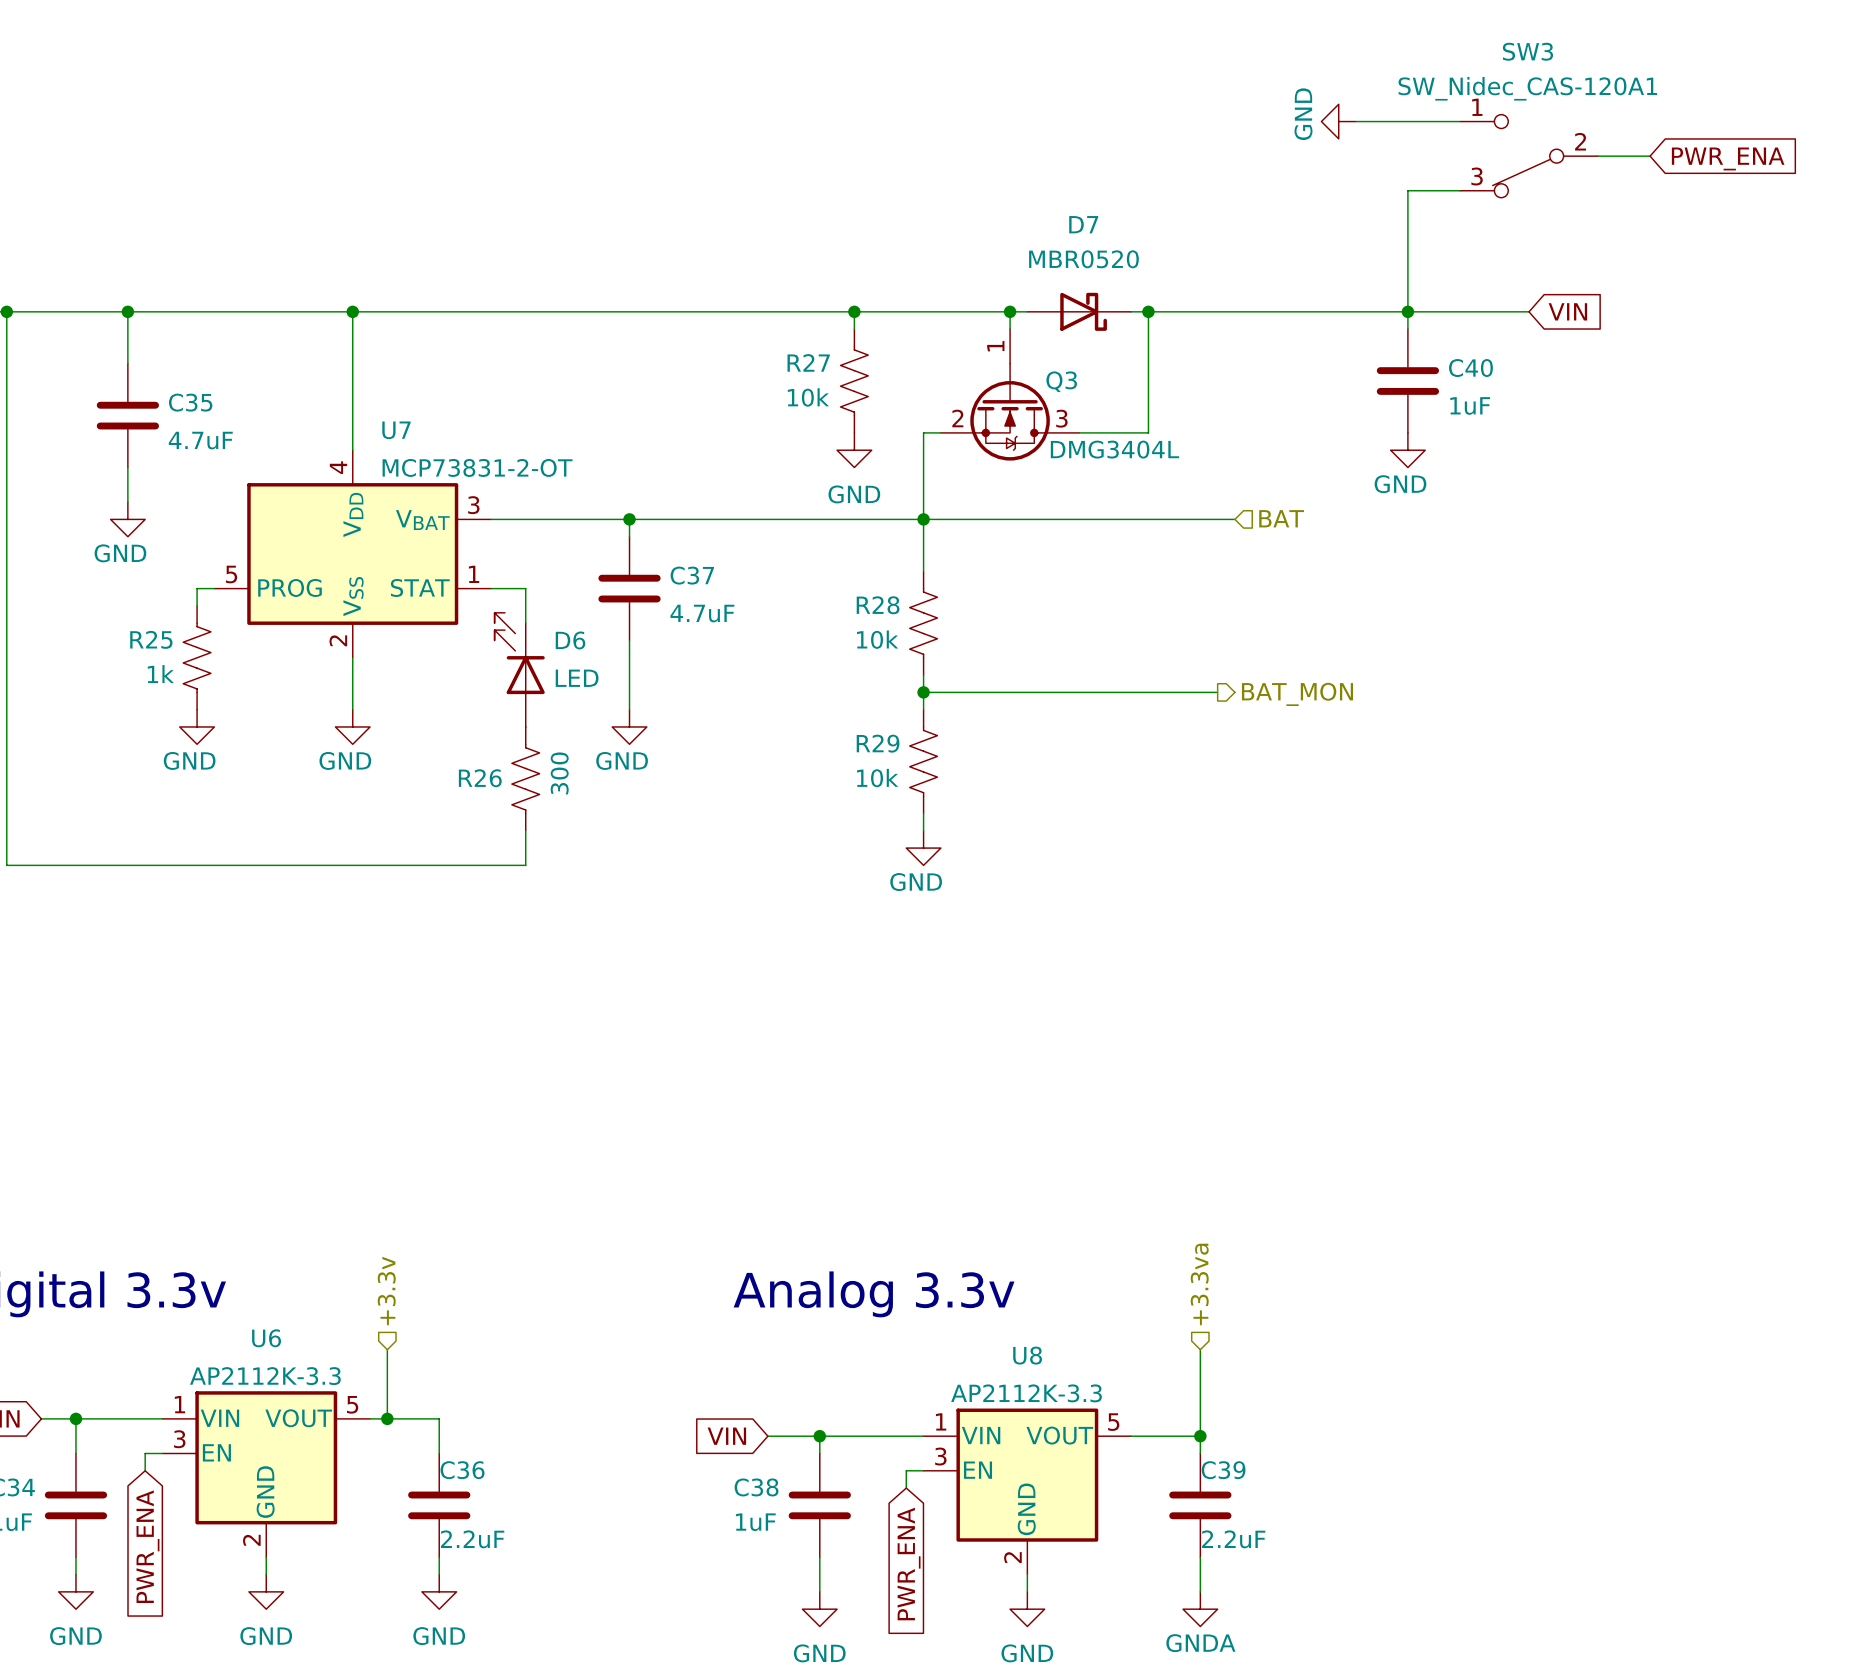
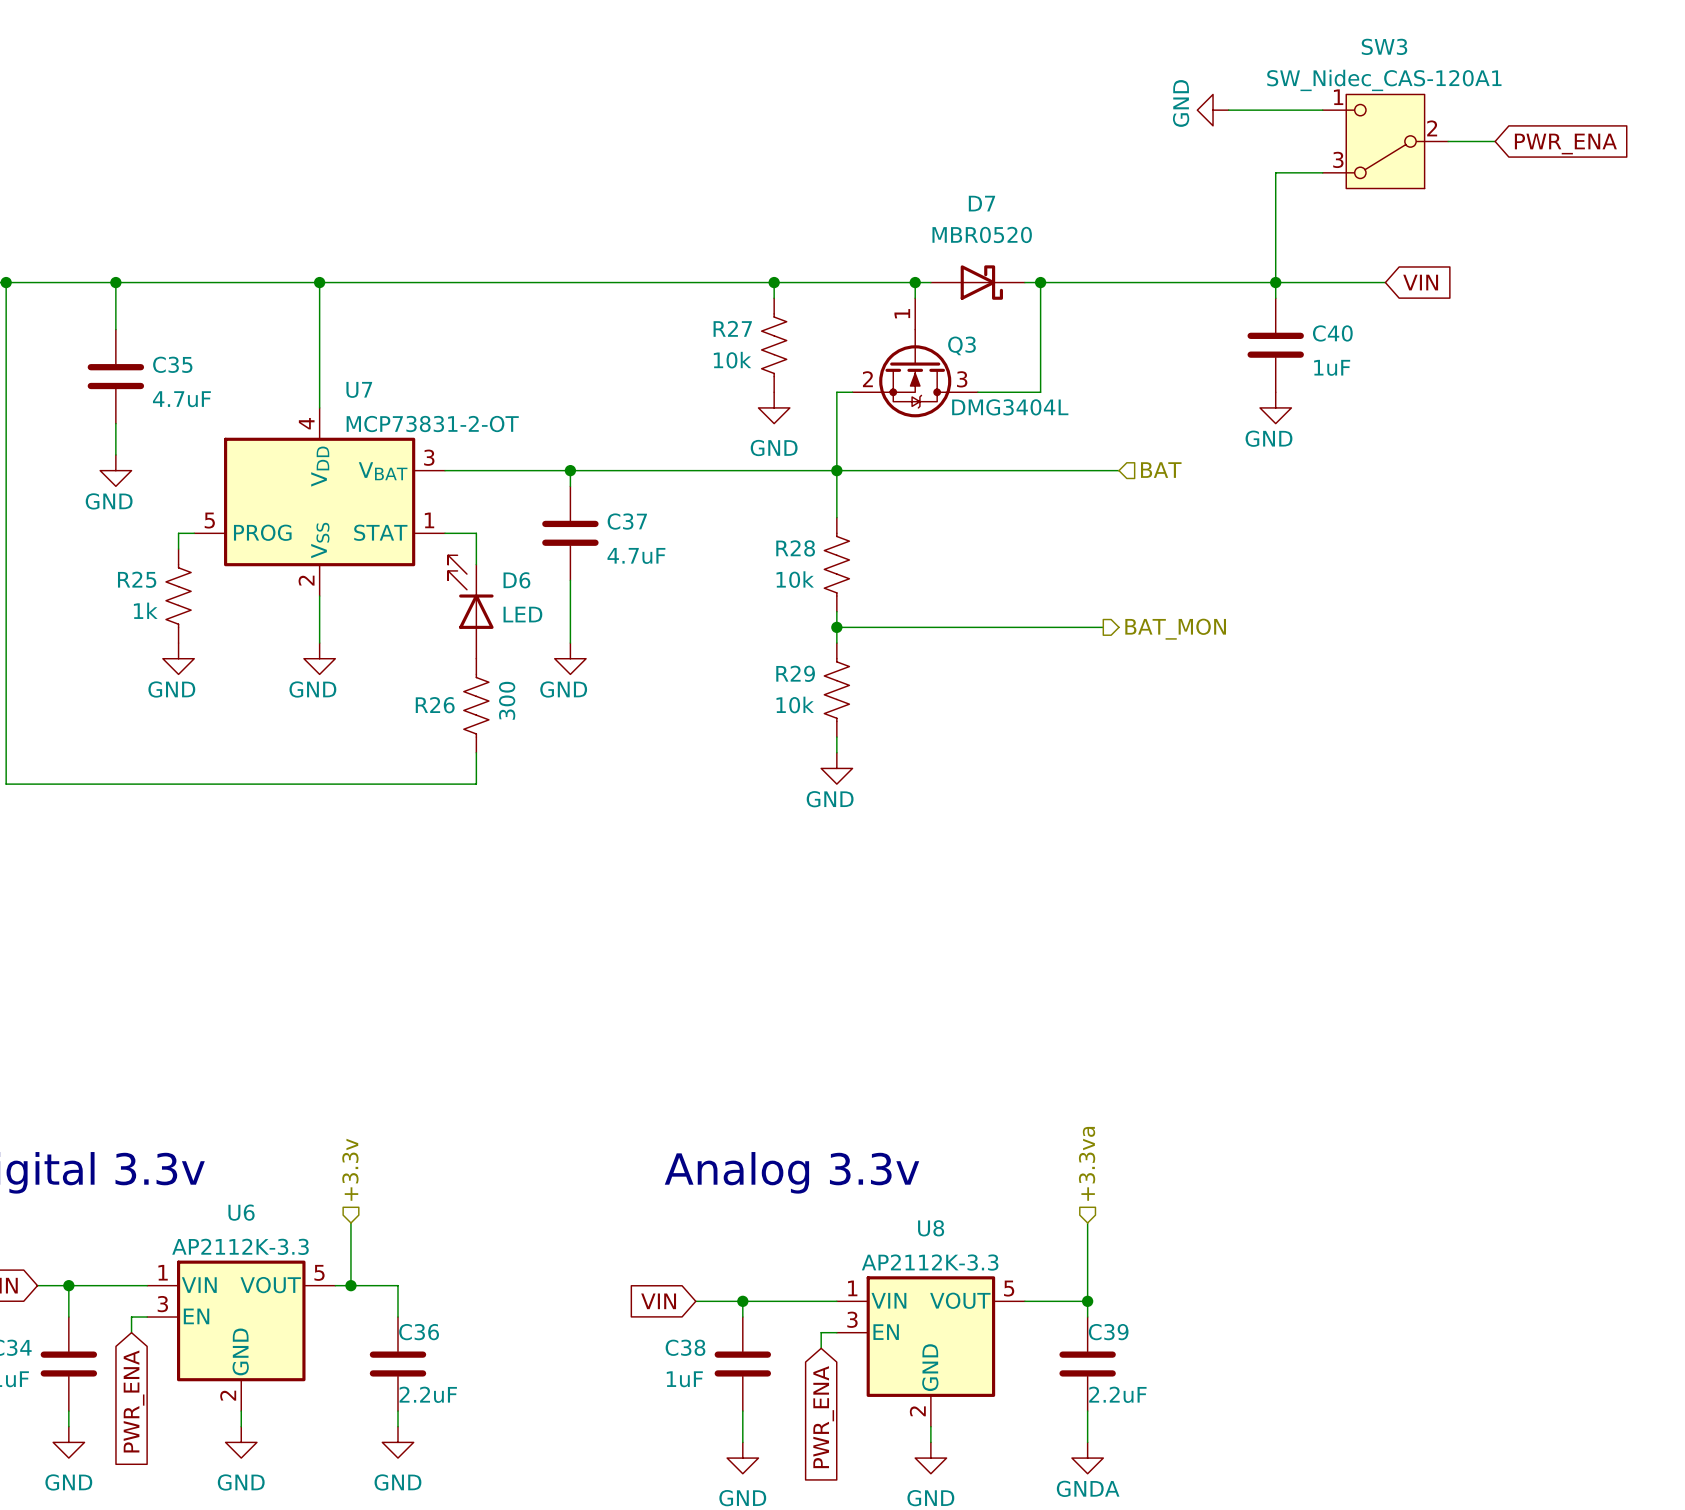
SW3 symbol: [1459, 114, 1599, 198] -> [1322, 94, 1449, 189]

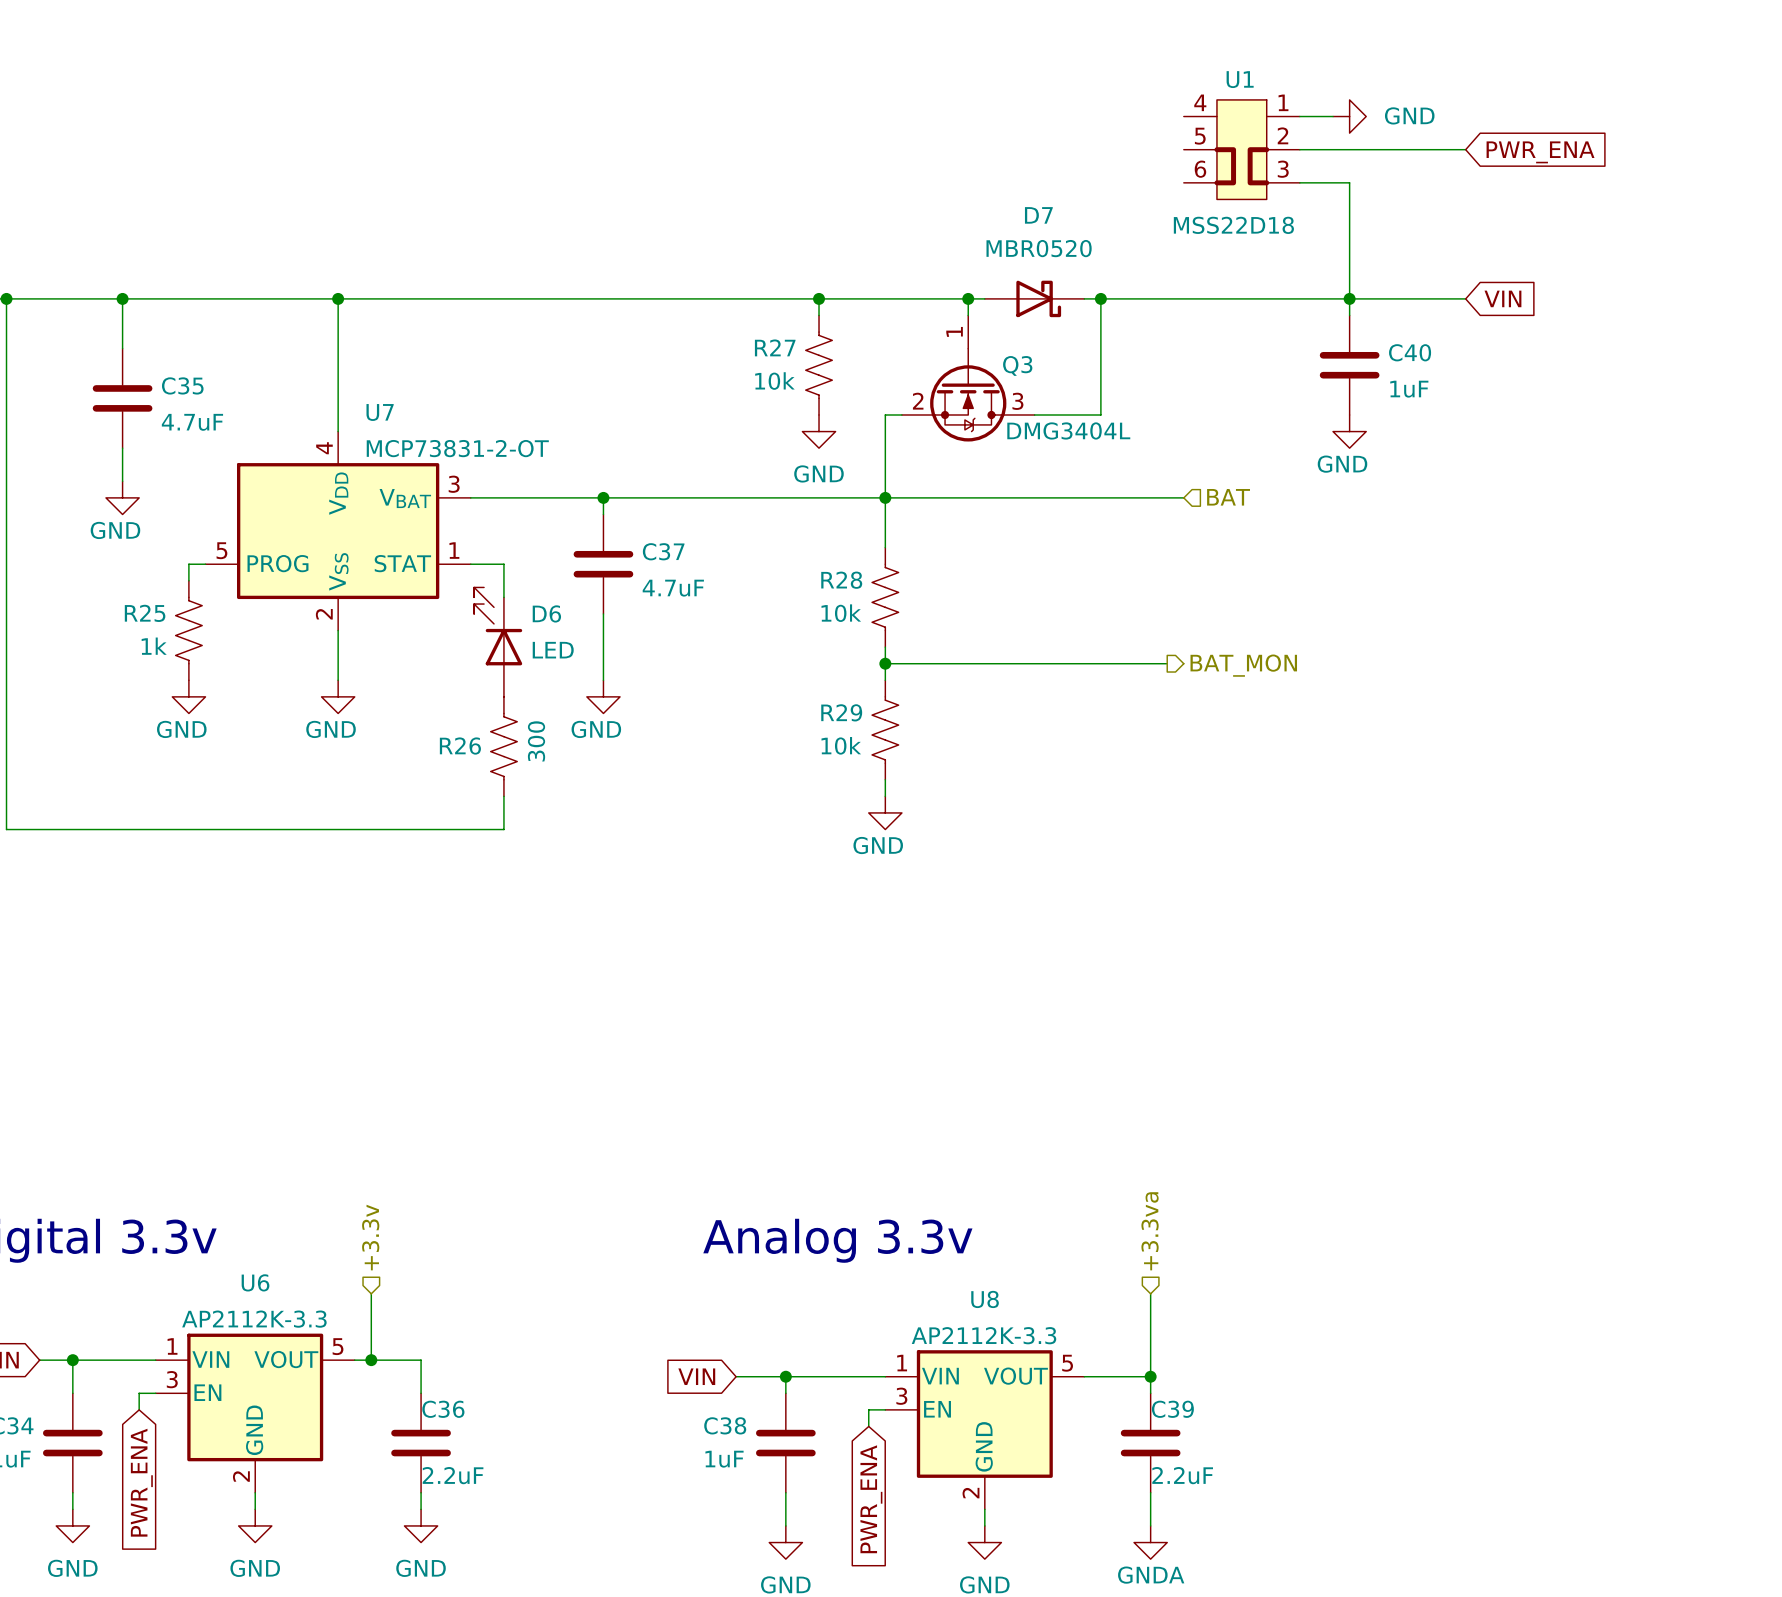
power symbol rotation: 0° (1213, 110) -> 180° (1349, 116)
power symbol position: GND (1213, 110) -> GND (1349, 116)
wire: (1260, 110) (1322, 110) -> none
U1: none -> MSS22D18 (1241, 149)
wire: none -> (1299, 149) (1465, 149)
SW3: SW_Nidec_CAS-120A1 (1385, 141) -> none
wire: (1448, 141) (1495, 141) -> none
global label position: PWR_ENA (1565, 144) -> PWR_ENA (1540, 152)
wire: (1275, 172) (1322, 172) -> (1349, 182) (1299, 182)

